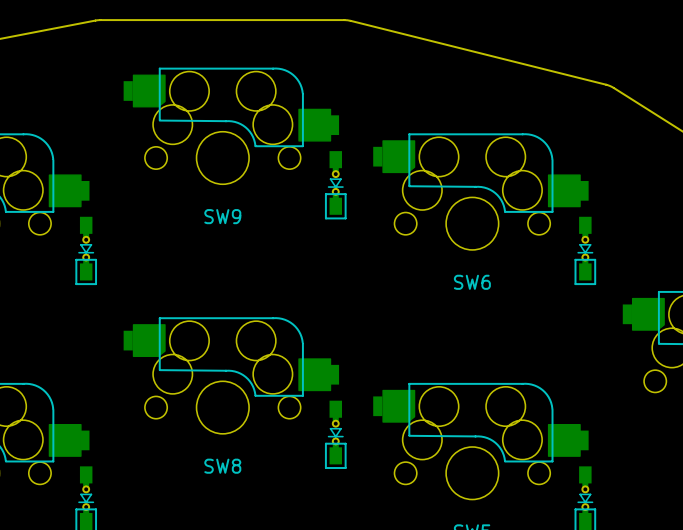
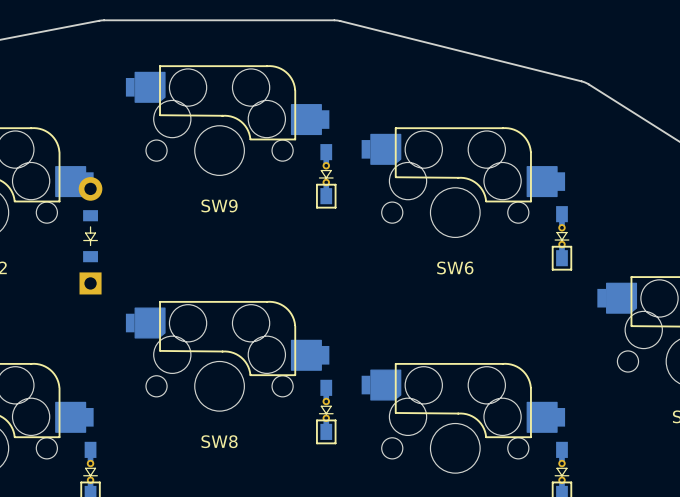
part footprint: [75, 216, 98, 286] -> [78, 177, 103, 295]

